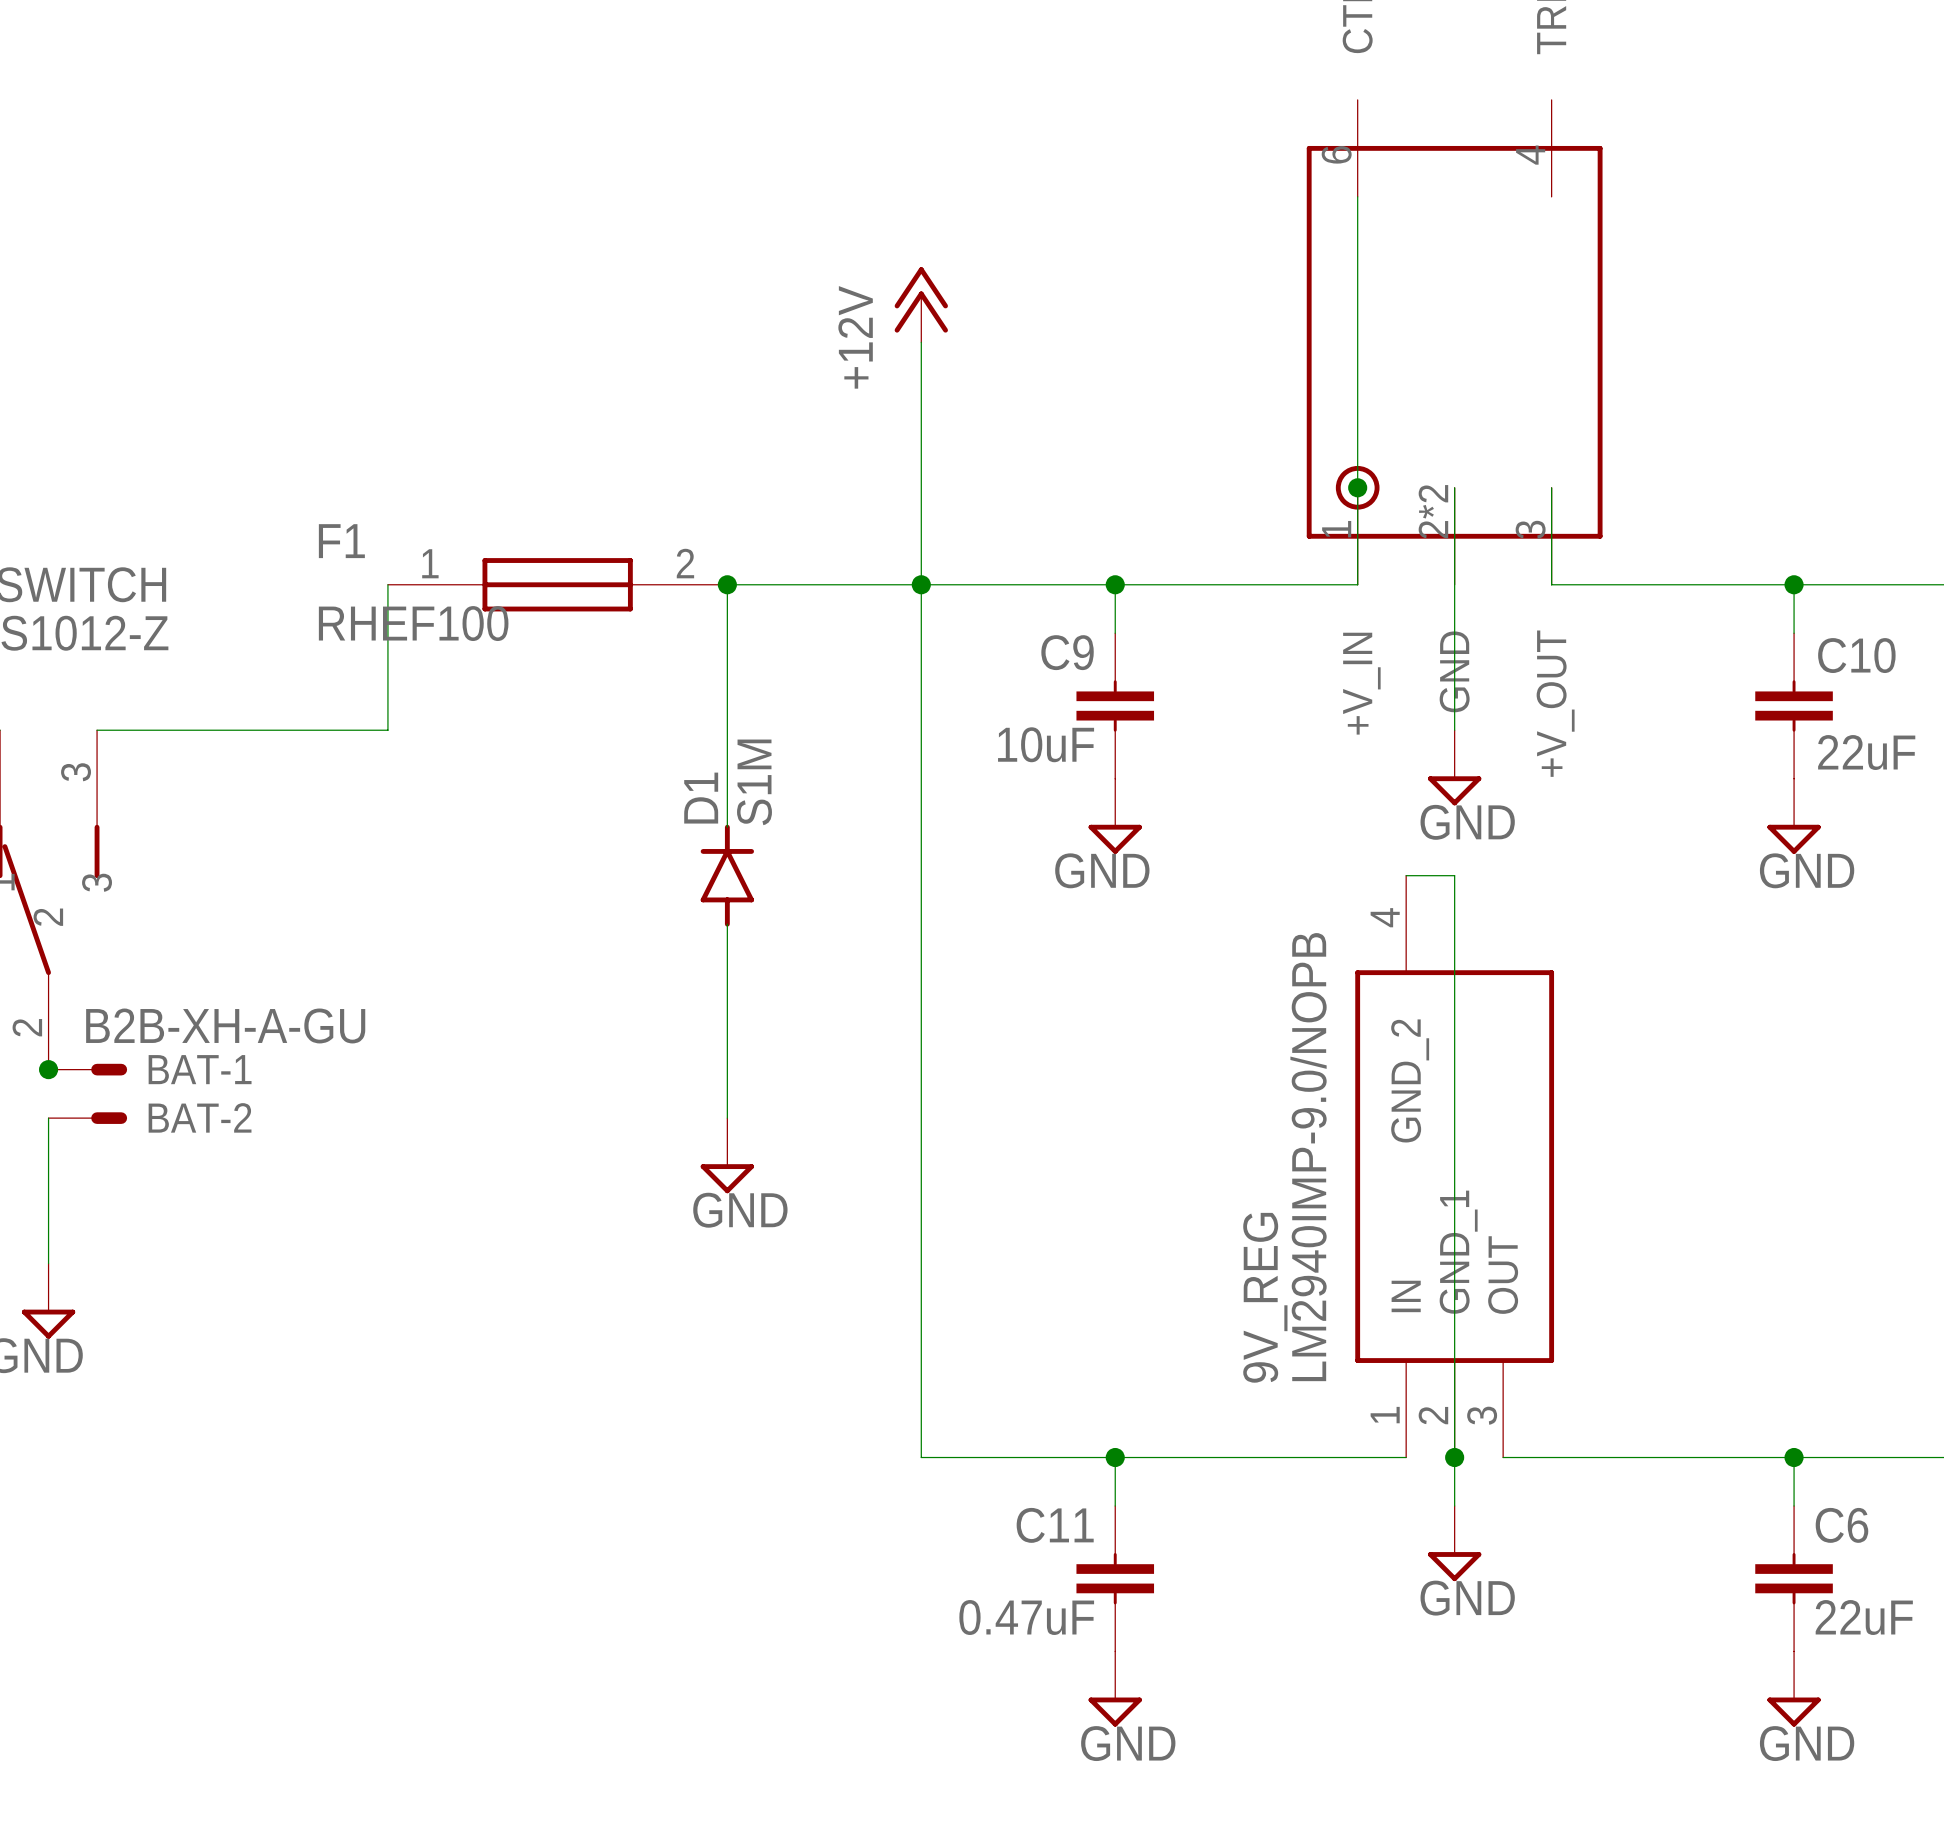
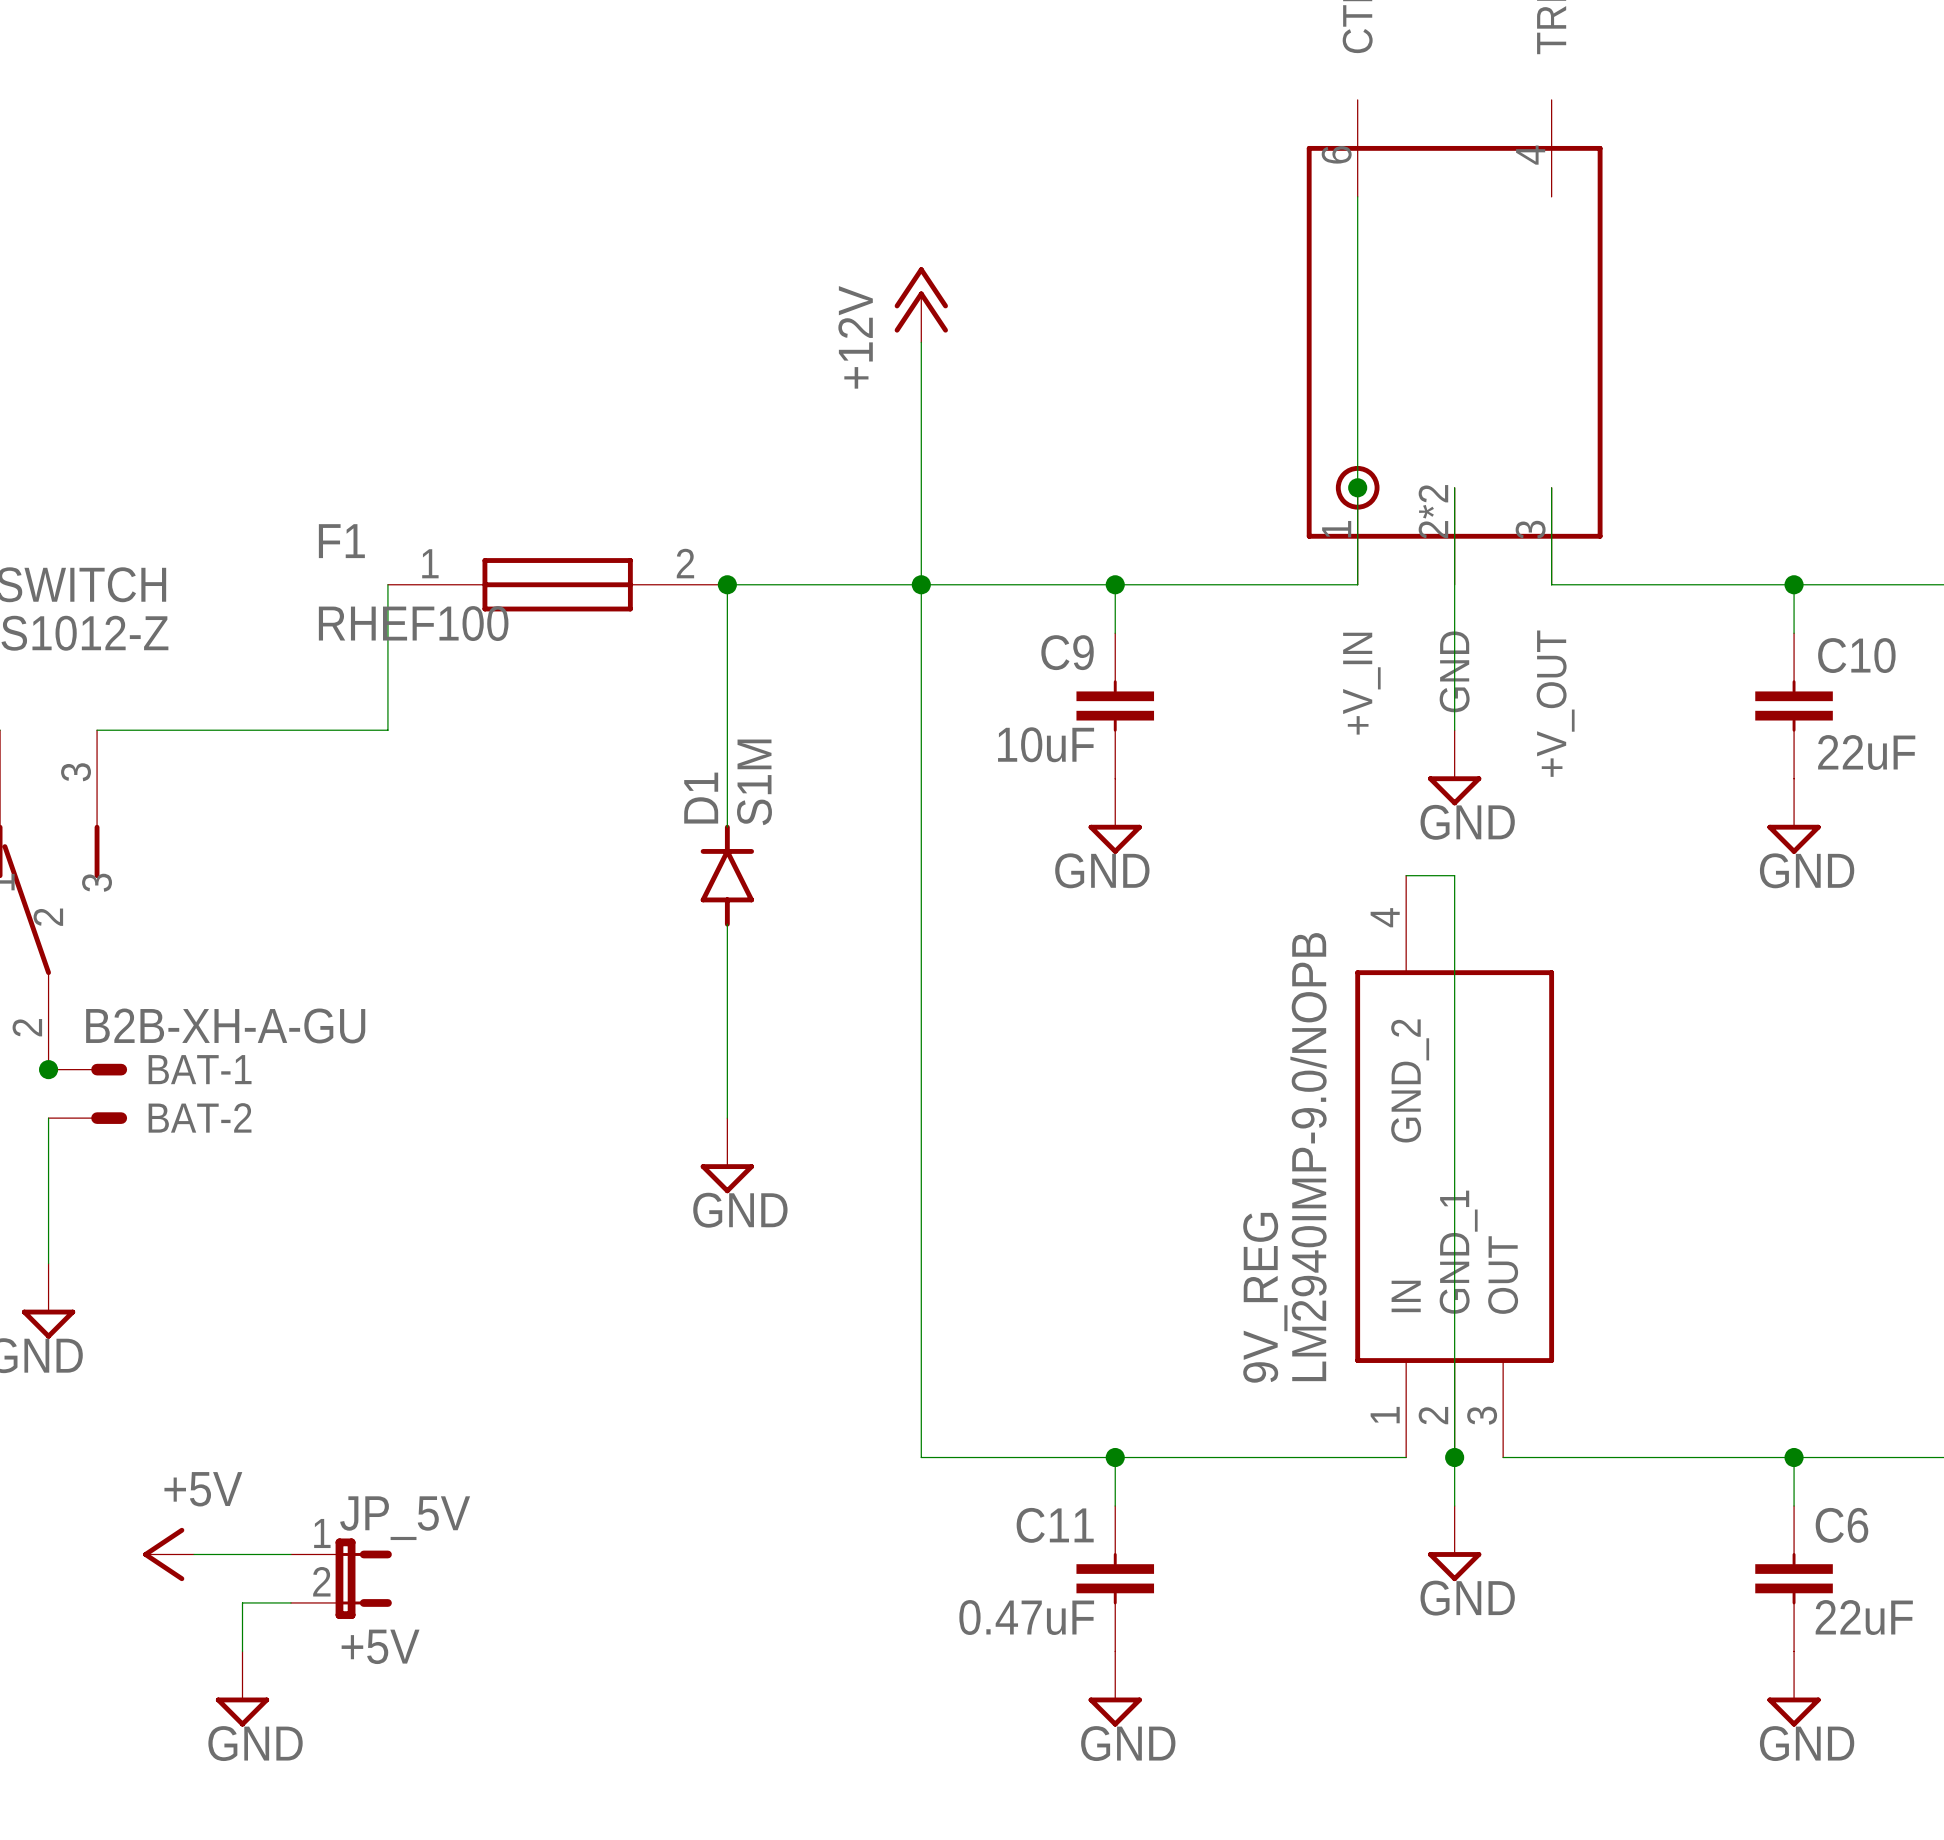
power symbol: none -> +5V (168, 1554)
wire: none -> (194, 1554) (290, 1554)
JP_5V: none -> +5V (341, 1578)
wire: none -> (290, 1602) (242, 1602) (242, 1651)
power symbol: none -> GND (242, 1689)

